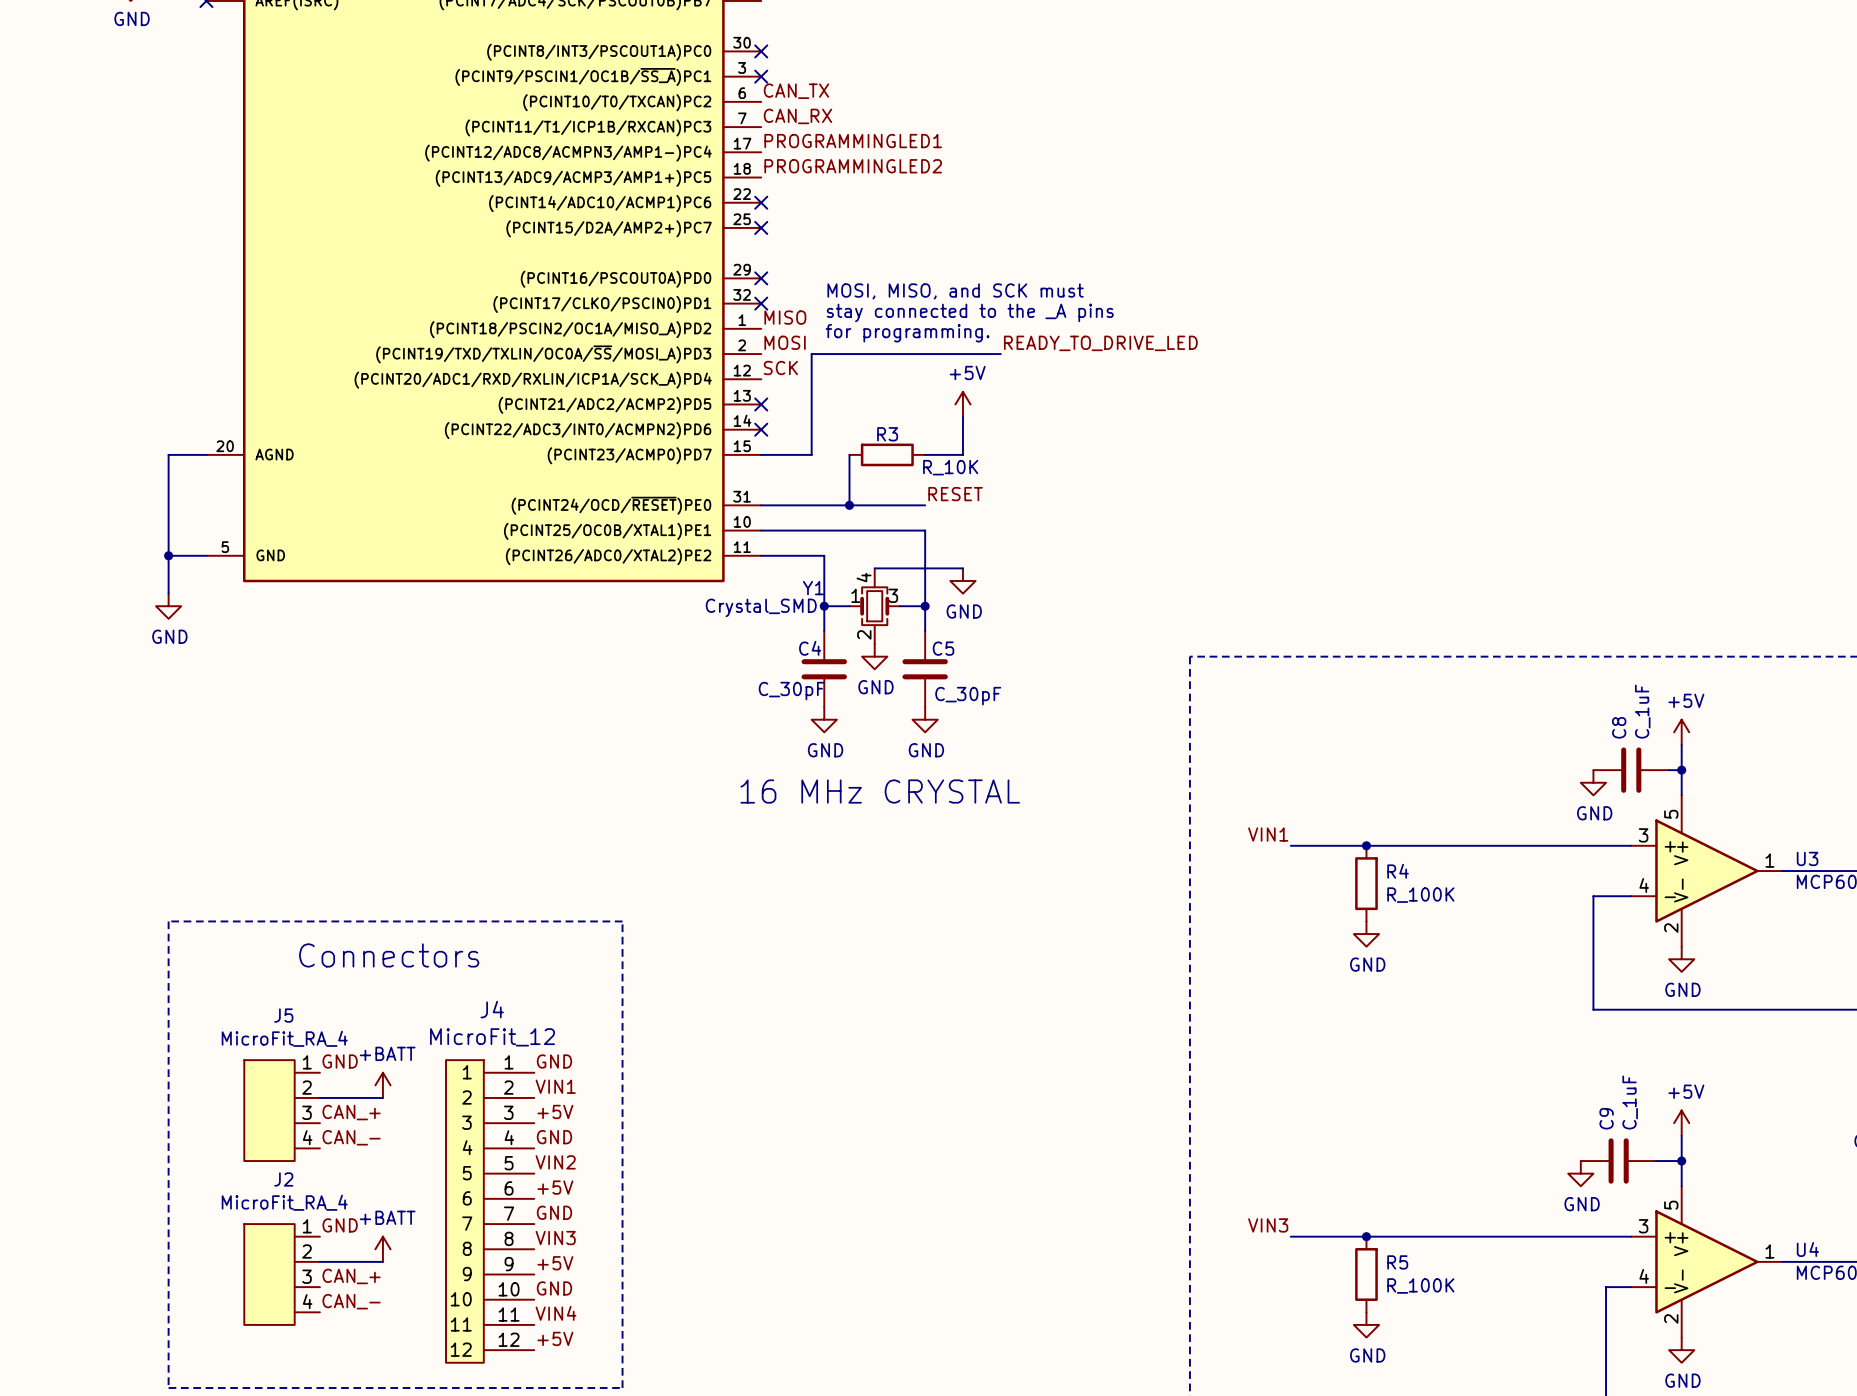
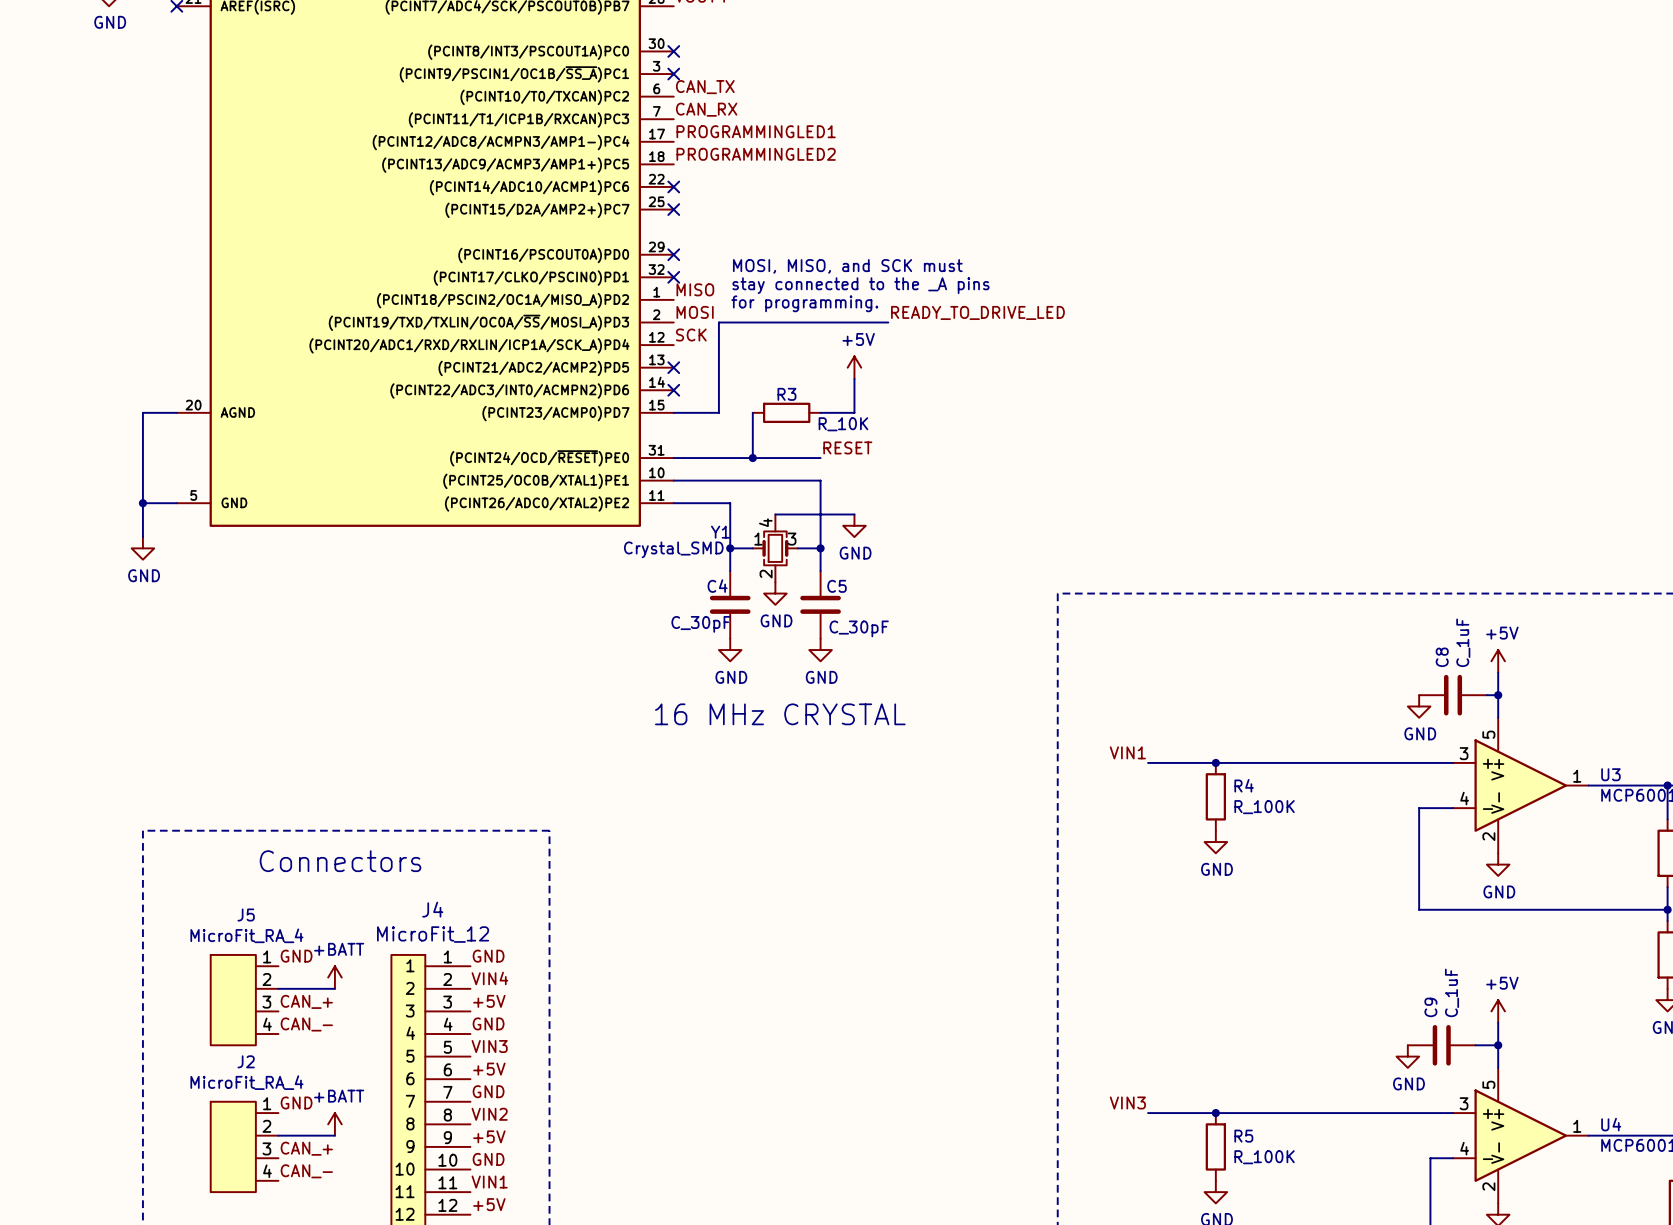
label: VIN1 (555, 1086) -> VIN4 (489, 978)
label: VIN2 (555, 1162) -> VIN3 (489, 1046)
label: VIN3 (555, 1238) -> VIN2 (489, 1114)
label: VIN4 (555, 1313) -> VIN1 (489, 1182)

